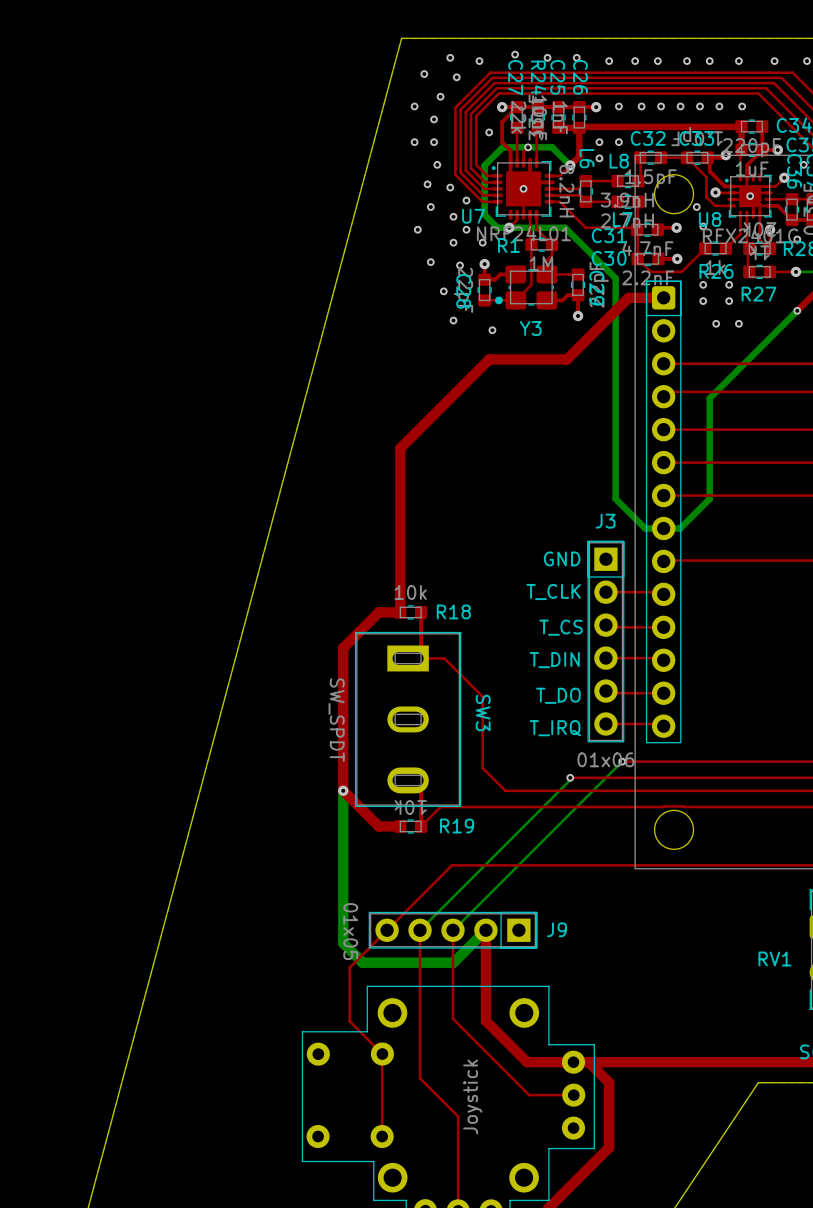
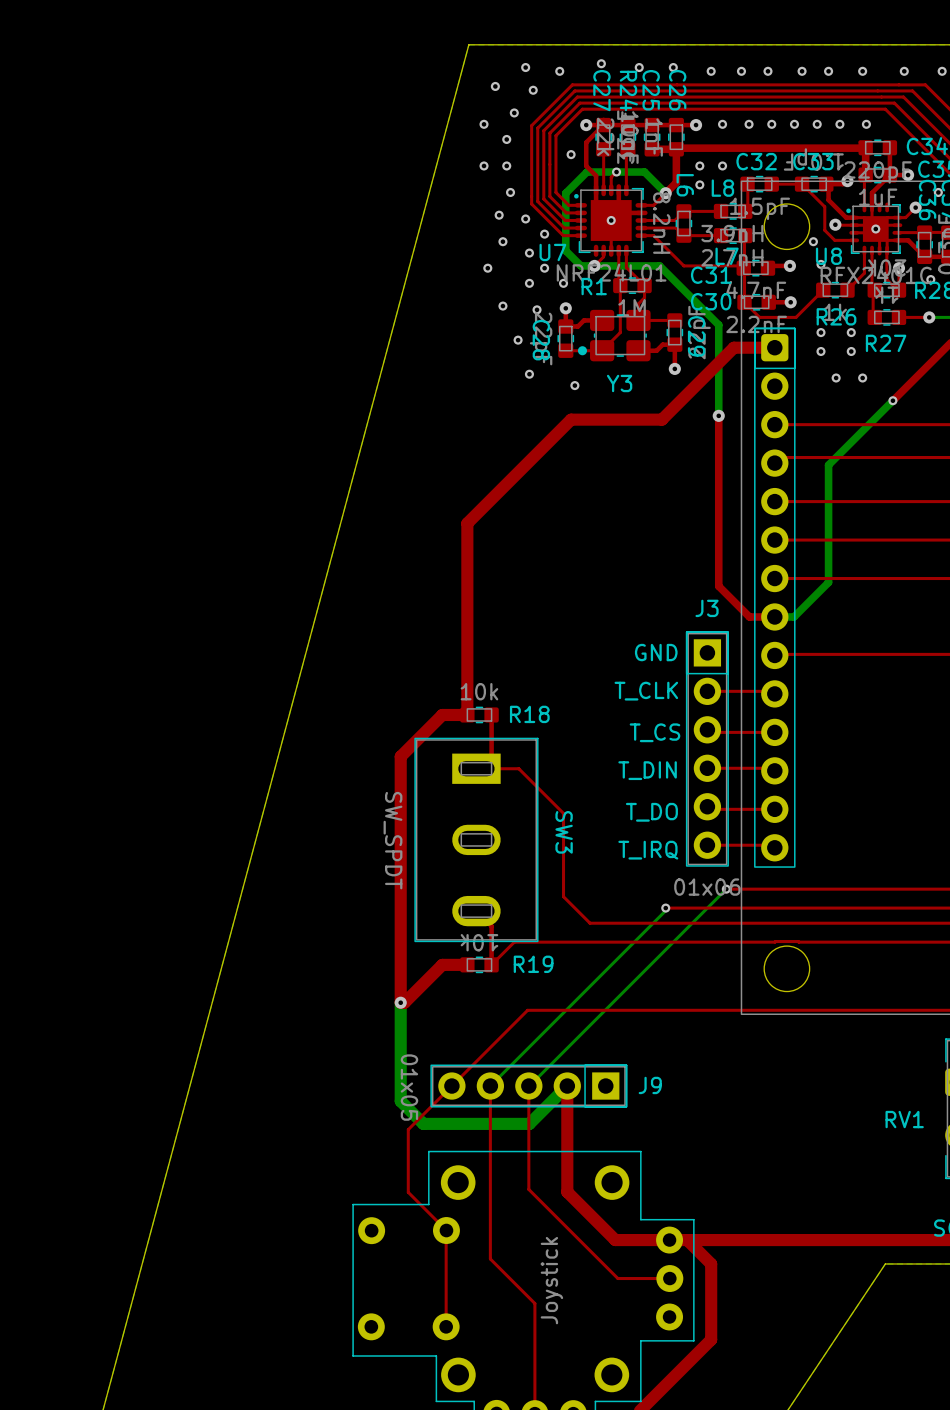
top track: none -> (930, 362) (892, 400)
bottom track: (797, 310) (764, 343) -> none
via position: (797, 310) -> (892, 400)
top track: none -> (718, 415) (718, 586) (749, 616) (774, 616)
bottom track: (615, 356) (615, 498) (645, 528) (663, 528) -> none
via: none -> (718, 415)
top track: (343, 790) (378, 826) -> (400, 923) (400, 1002) (404, 1002) (442, 964)
bottom track: (343, 790) (343, 858) -> none
via position: (343, 790) -> (400, 1002)

